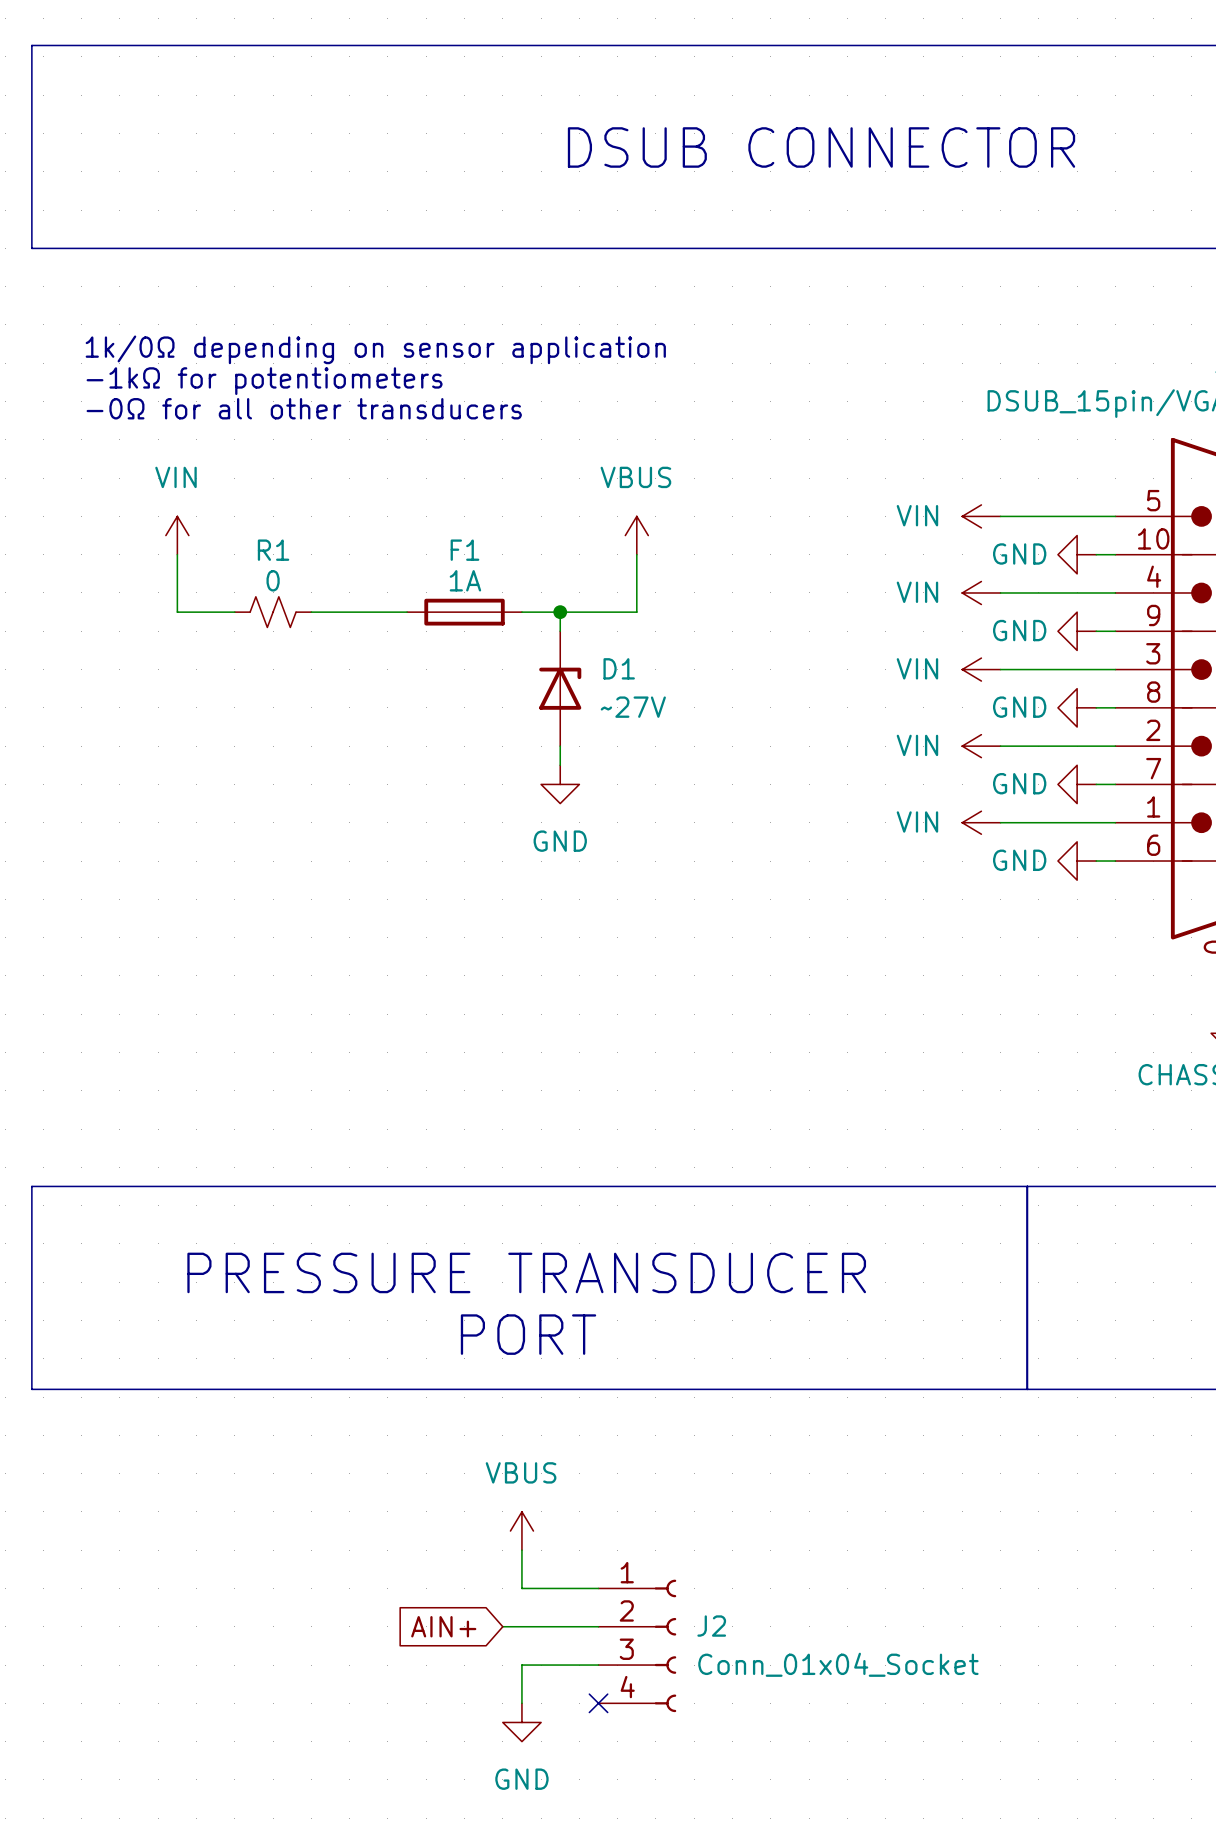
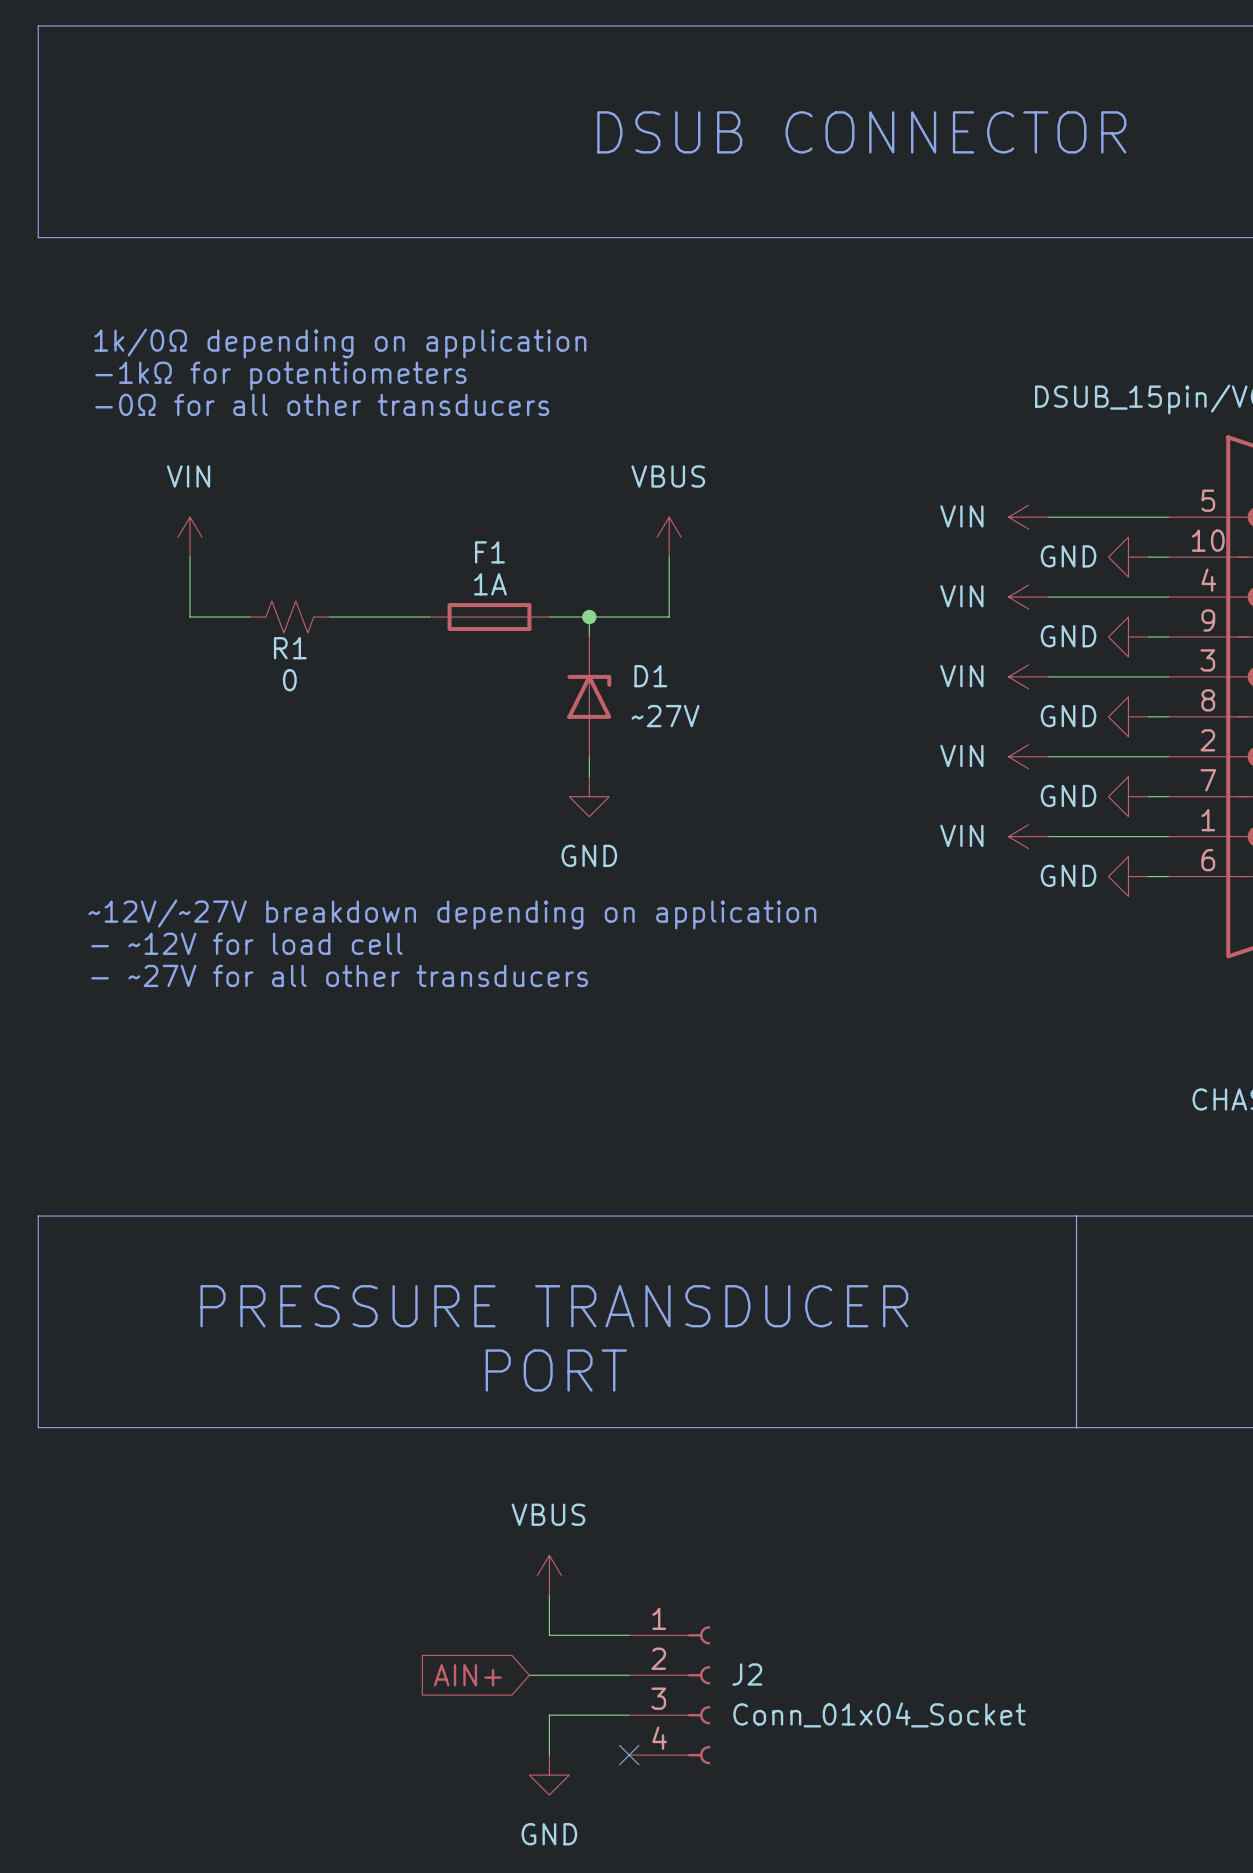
text: 1k/0Ω depending on sensor application (375, 349) -> 1k/0Ω depending on application (340, 343)
R1 name position: R1 (273, 550) -> R1 (290, 648)
R1 value position: 0 (273, 580) -> 0 (289, 680)
text: none -> ~12V/~27V breakdown depending on application (452, 914)
text: none -> - ~12V for load cell (247, 943)
text: none -> - ~27V for all other transducers (339, 975)

